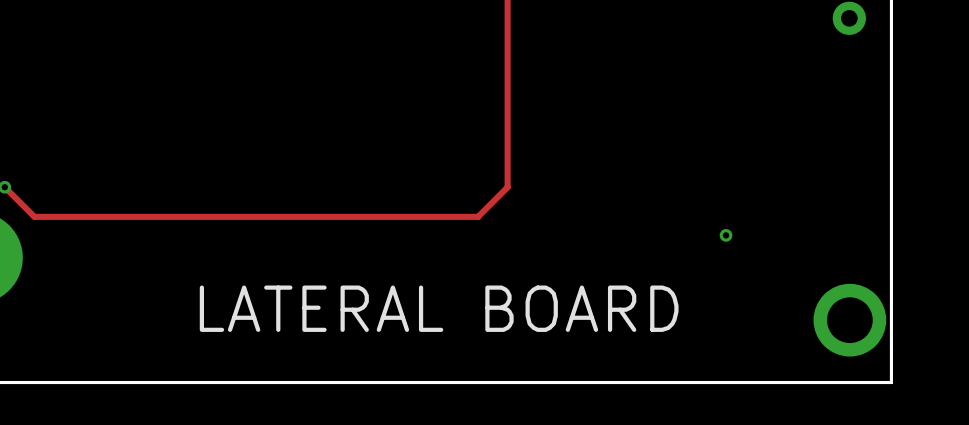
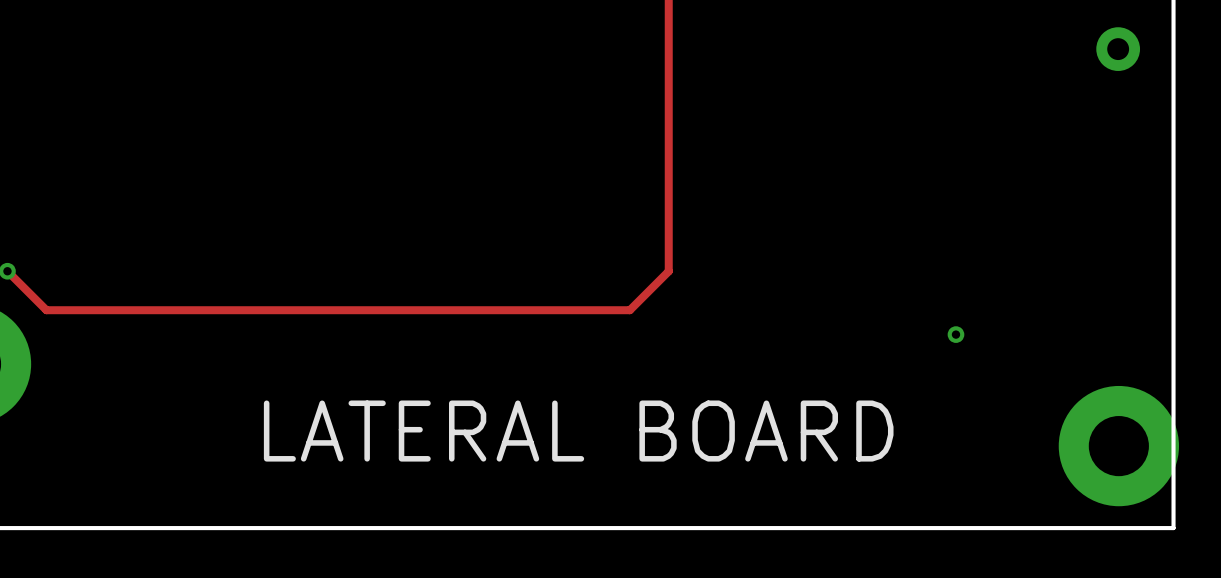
part footprint: [813, 283, 887, 357] -> [1058, 385, 1179, 507]

